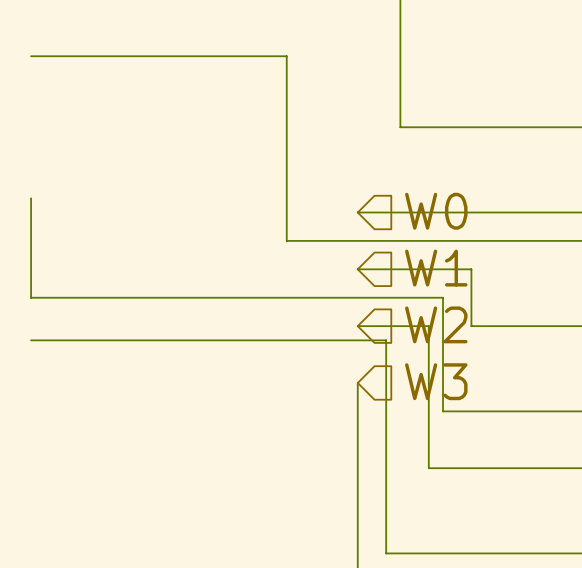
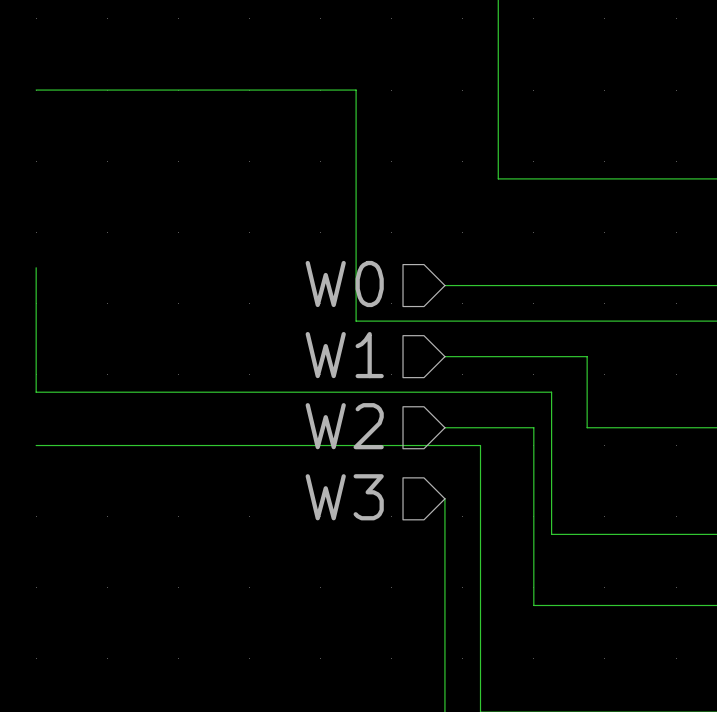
hierarchical label rotation: 0° (436, 211) -> 180° (344, 283)
hierarchical label position: W0 (436, 211) -> W0 (344, 283)
hierarchical label rotation: 0° (436, 268) -> 180° (344, 355)
hierarchical label position: W1 (436, 268) -> W1 (344, 355)
hierarchical label rotation: 0° (436, 324) -> 180° (344, 426)
hierarchical label position: W2 (436, 324) -> W2 (344, 426)
hierarchical label rotation: 0° (436, 381) -> 180° (344, 497)
hierarchical label position: W3 (436, 381) -> W3 (344, 497)

